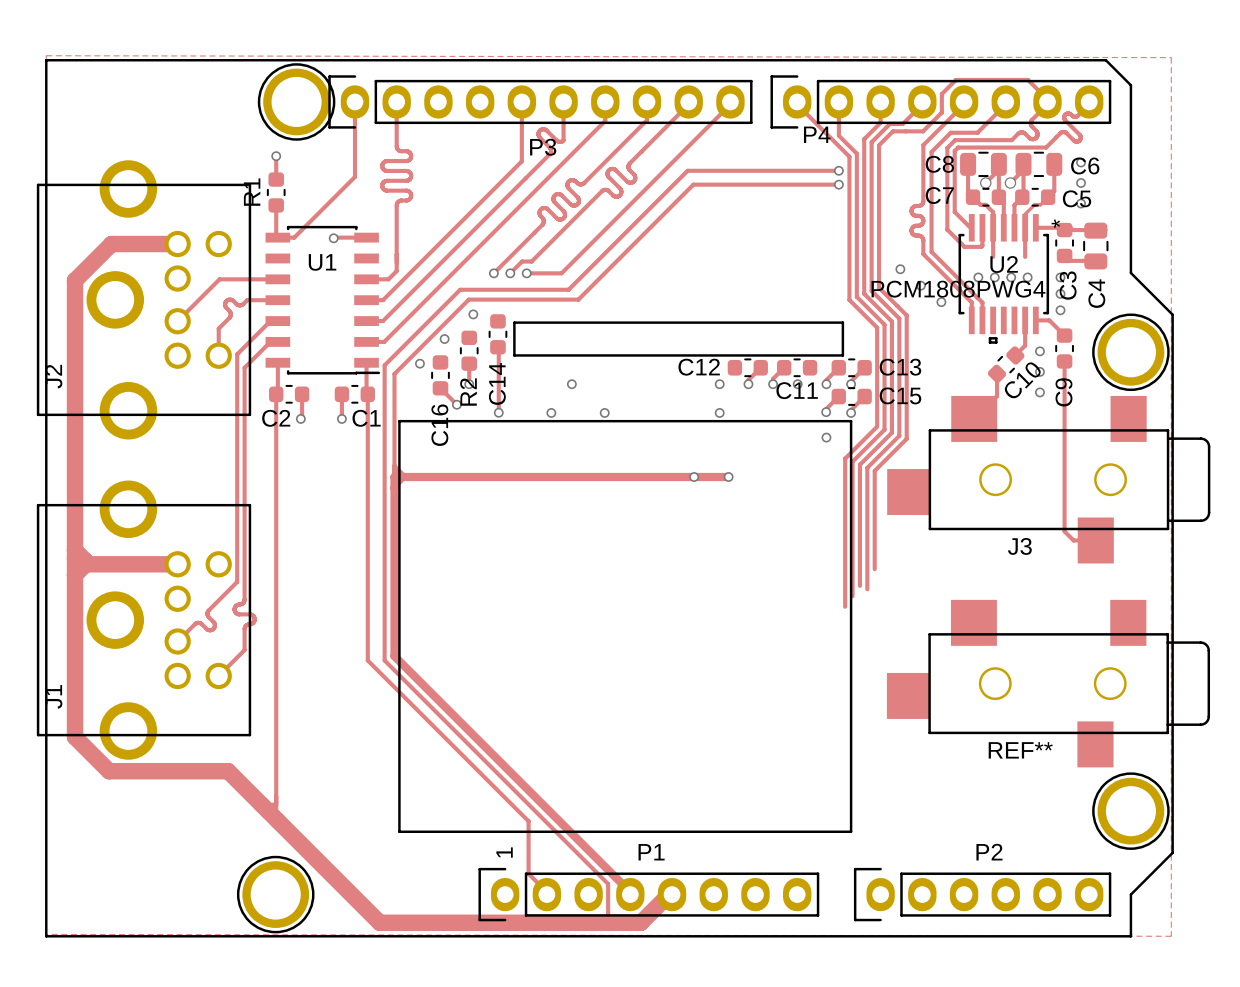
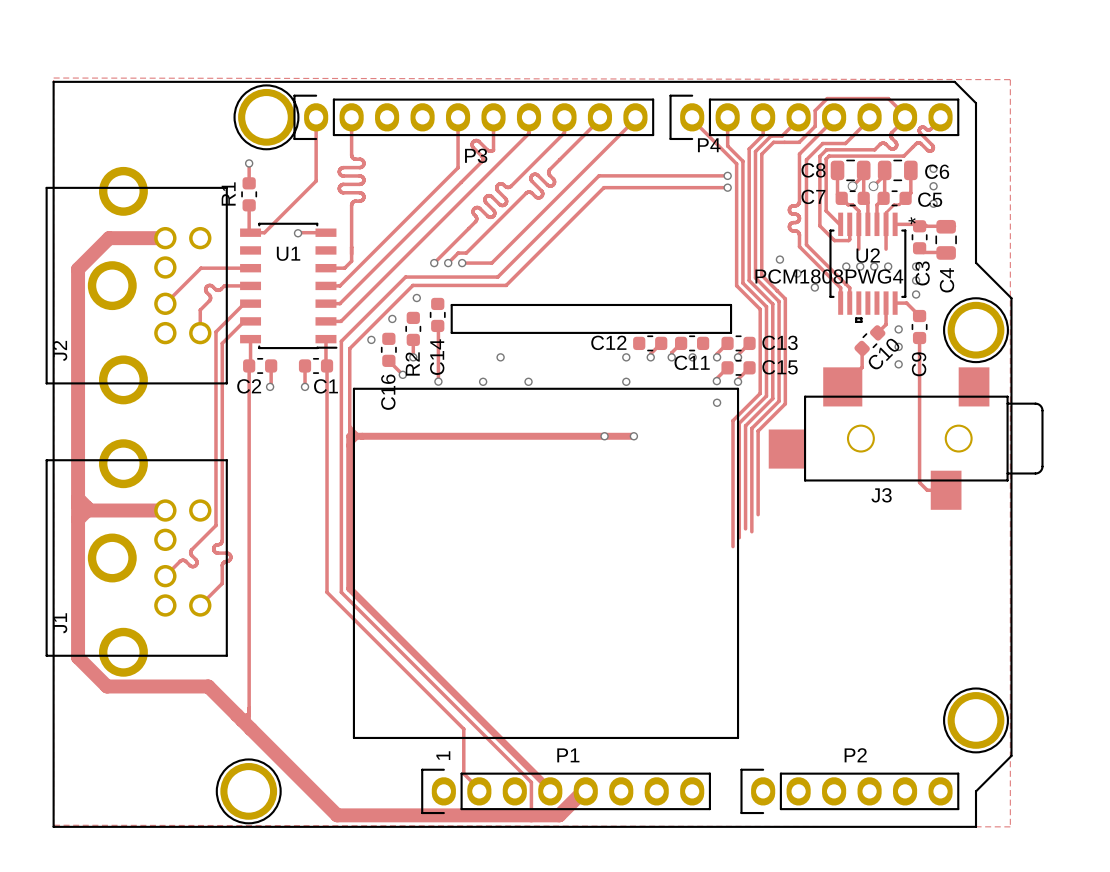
REF**: (1048, 683) -> none

